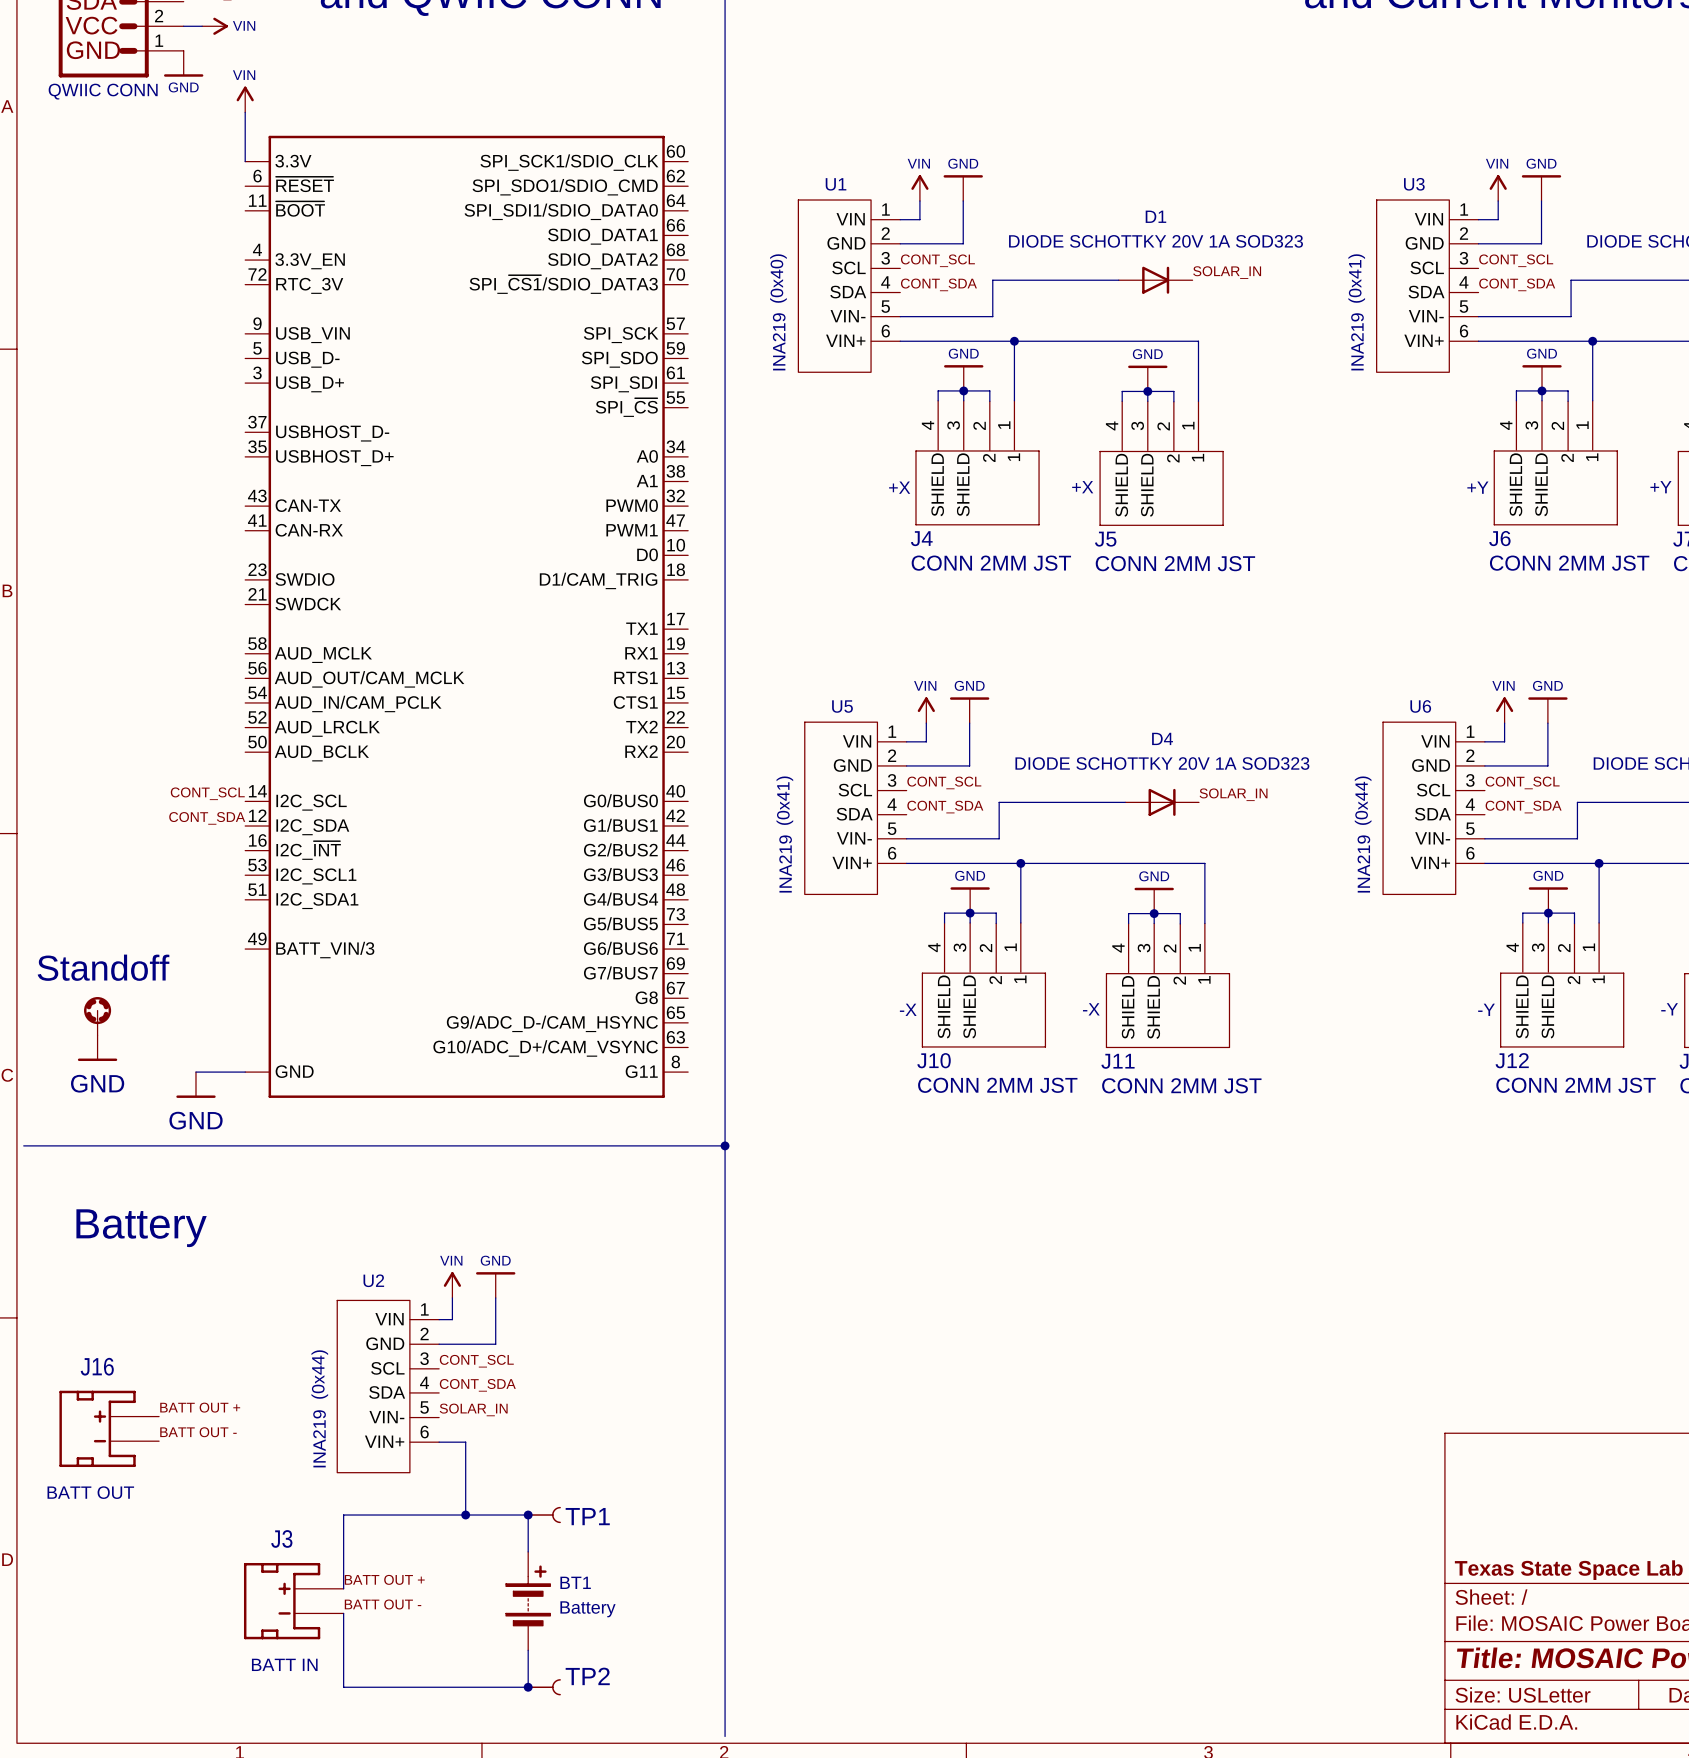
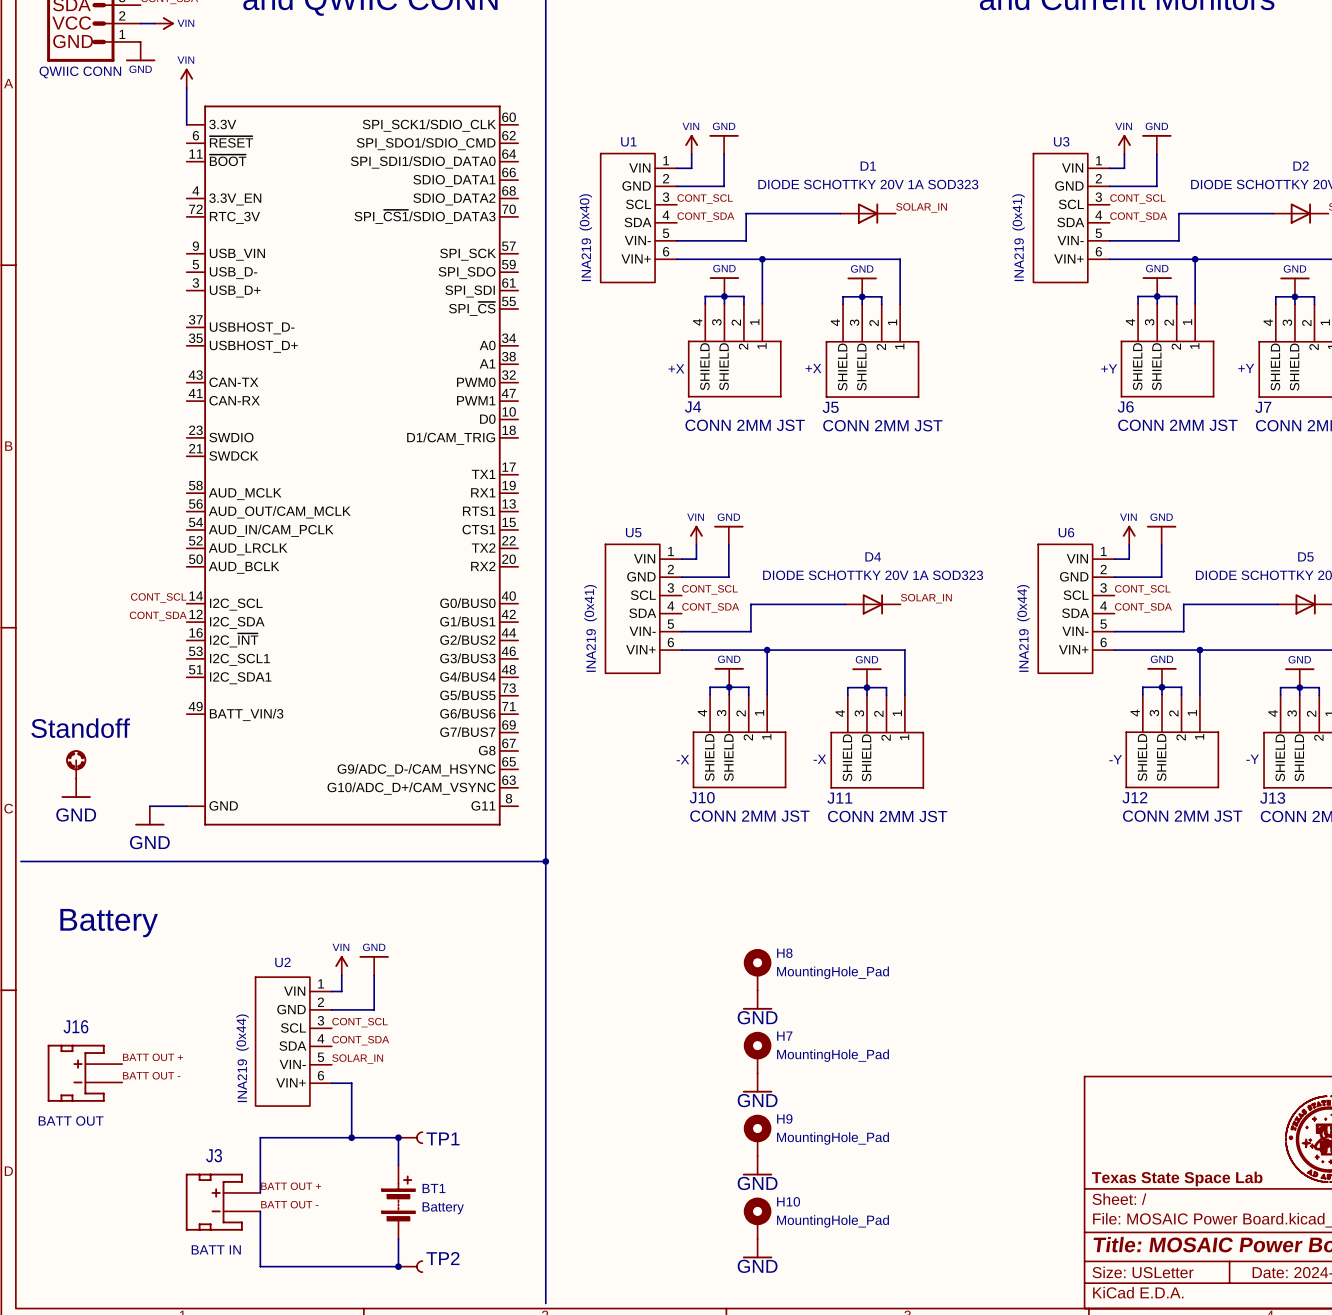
H8: none -> MountingHole_Pad (757, 969)
power symbol: none -> GND (757, 1000)
H7: none -> MountingHole_Pad (757, 1052)
power symbol: none -> GND (757, 1082)
H9: none -> MountingHole_Pad (757, 1135)
power symbol: none -> GND (757, 1165)
H10: none -> MountingHole_Pad (757, 1218)
power symbol: none -> GND (757, 1248)

